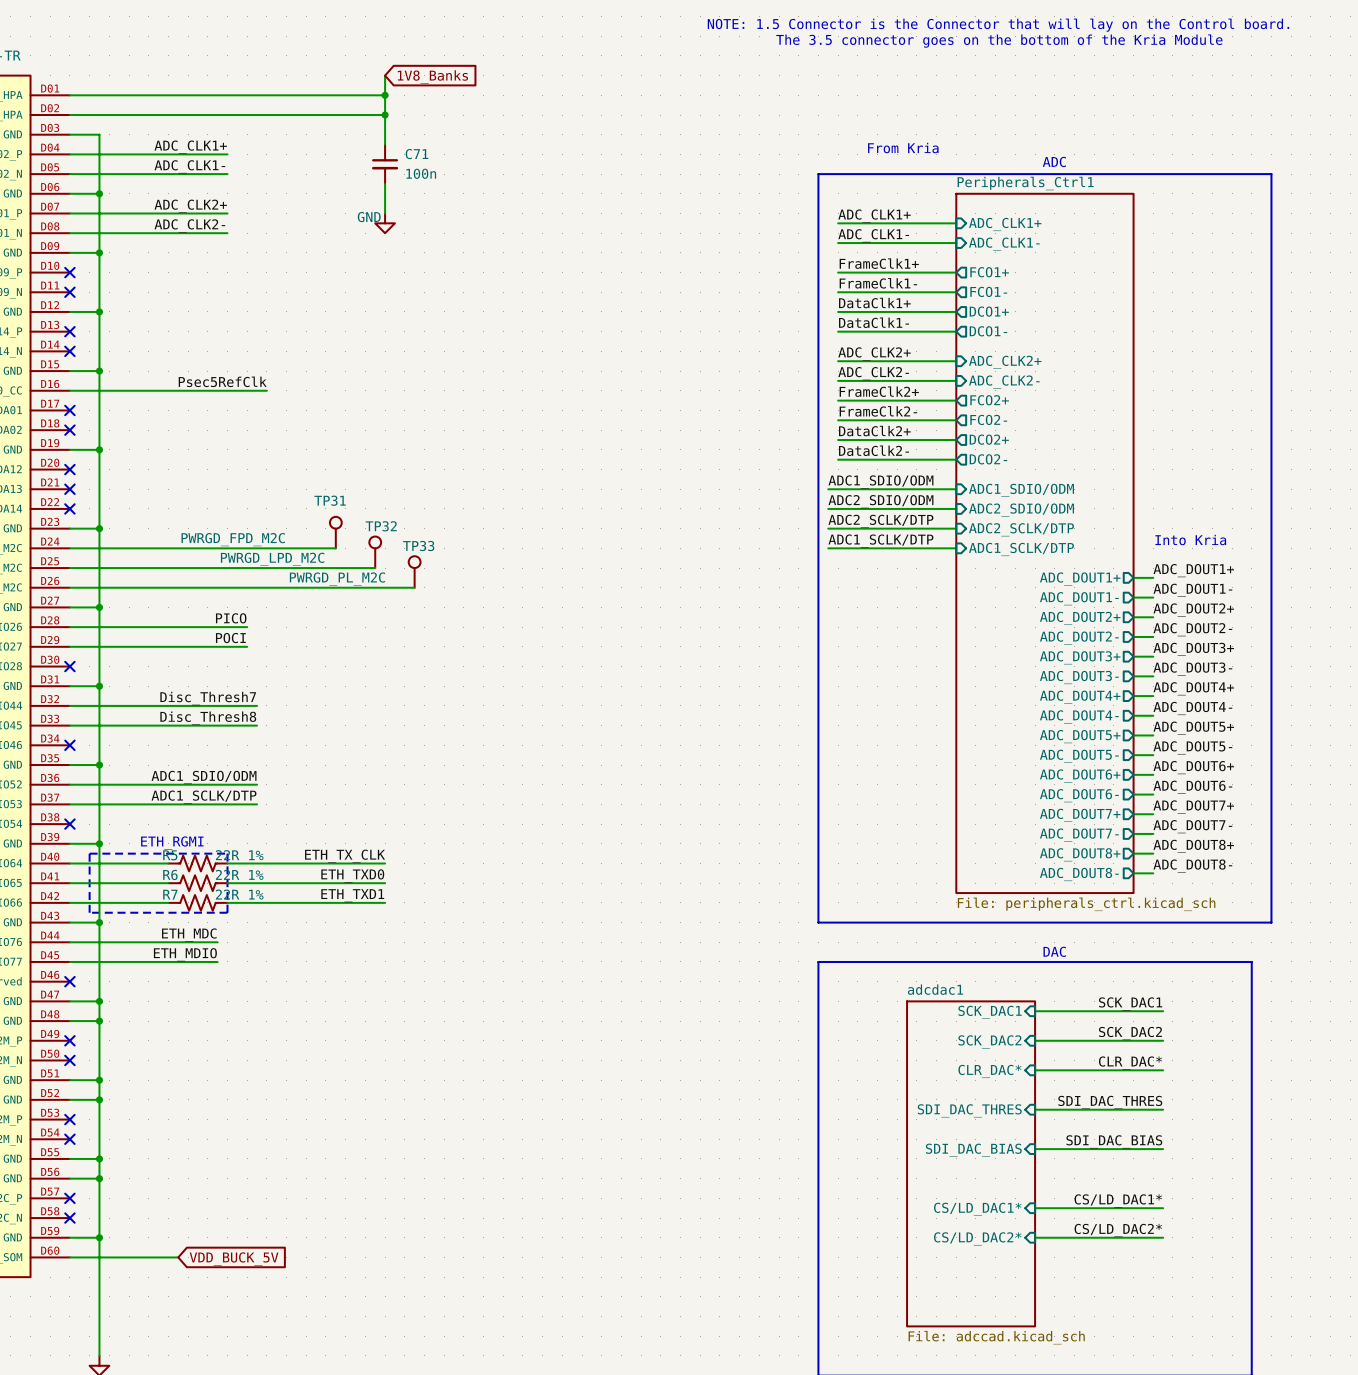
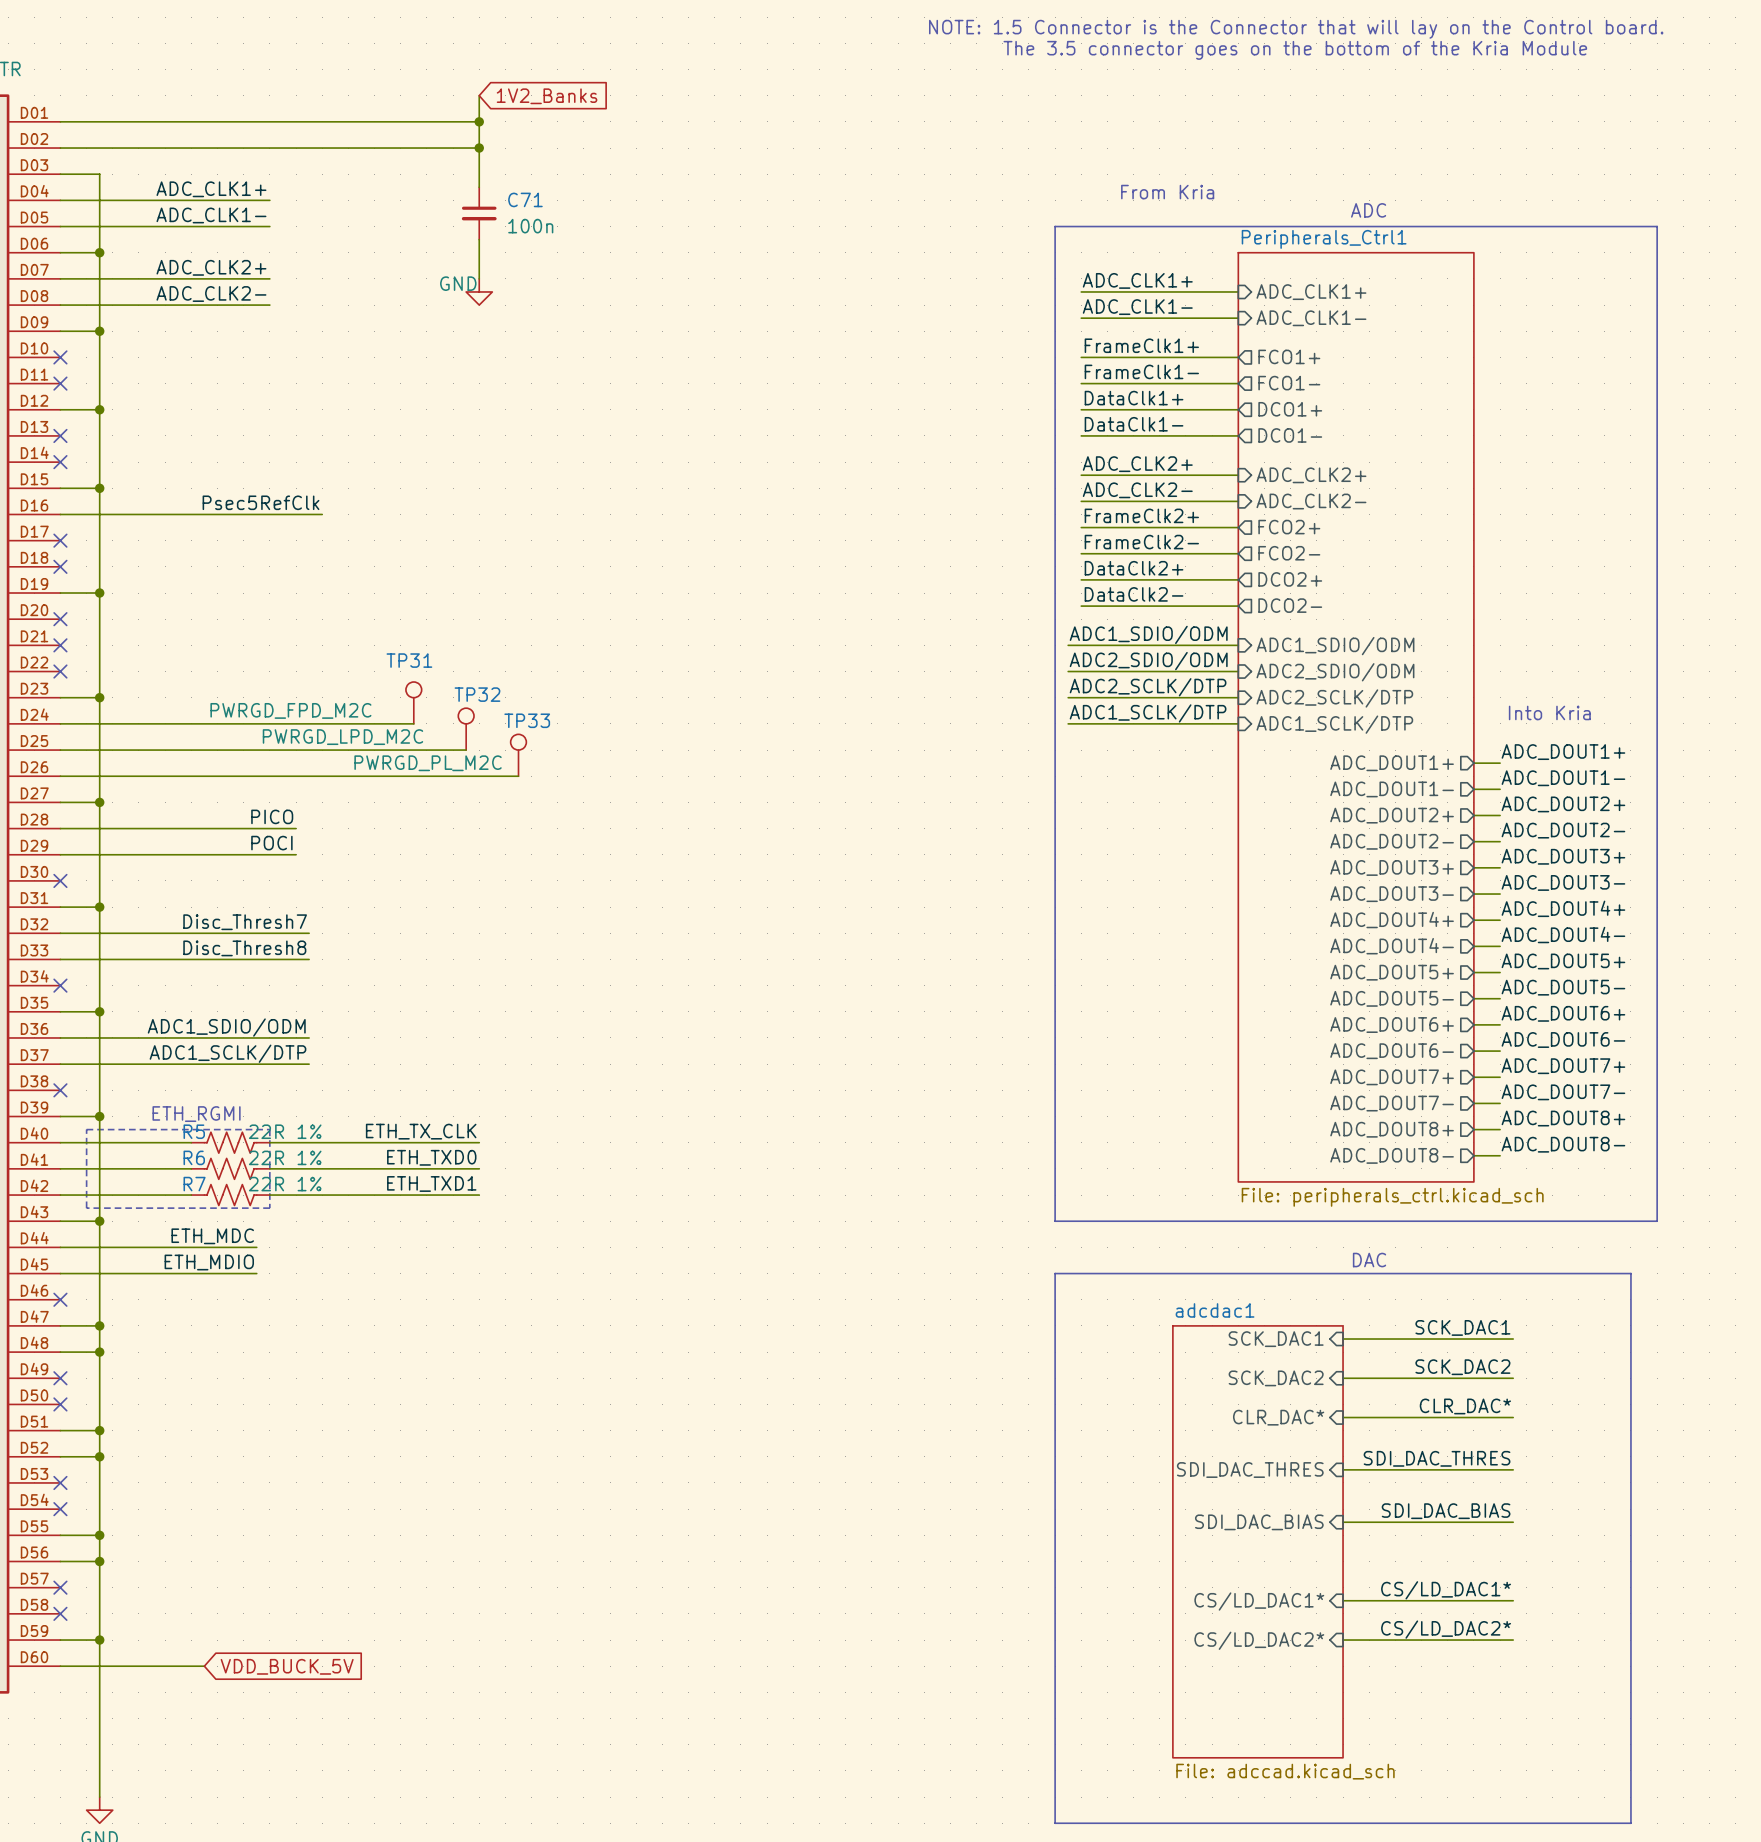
global label: 1V8_Banks (432, 76) -> 1V2_Banks (547, 96)

